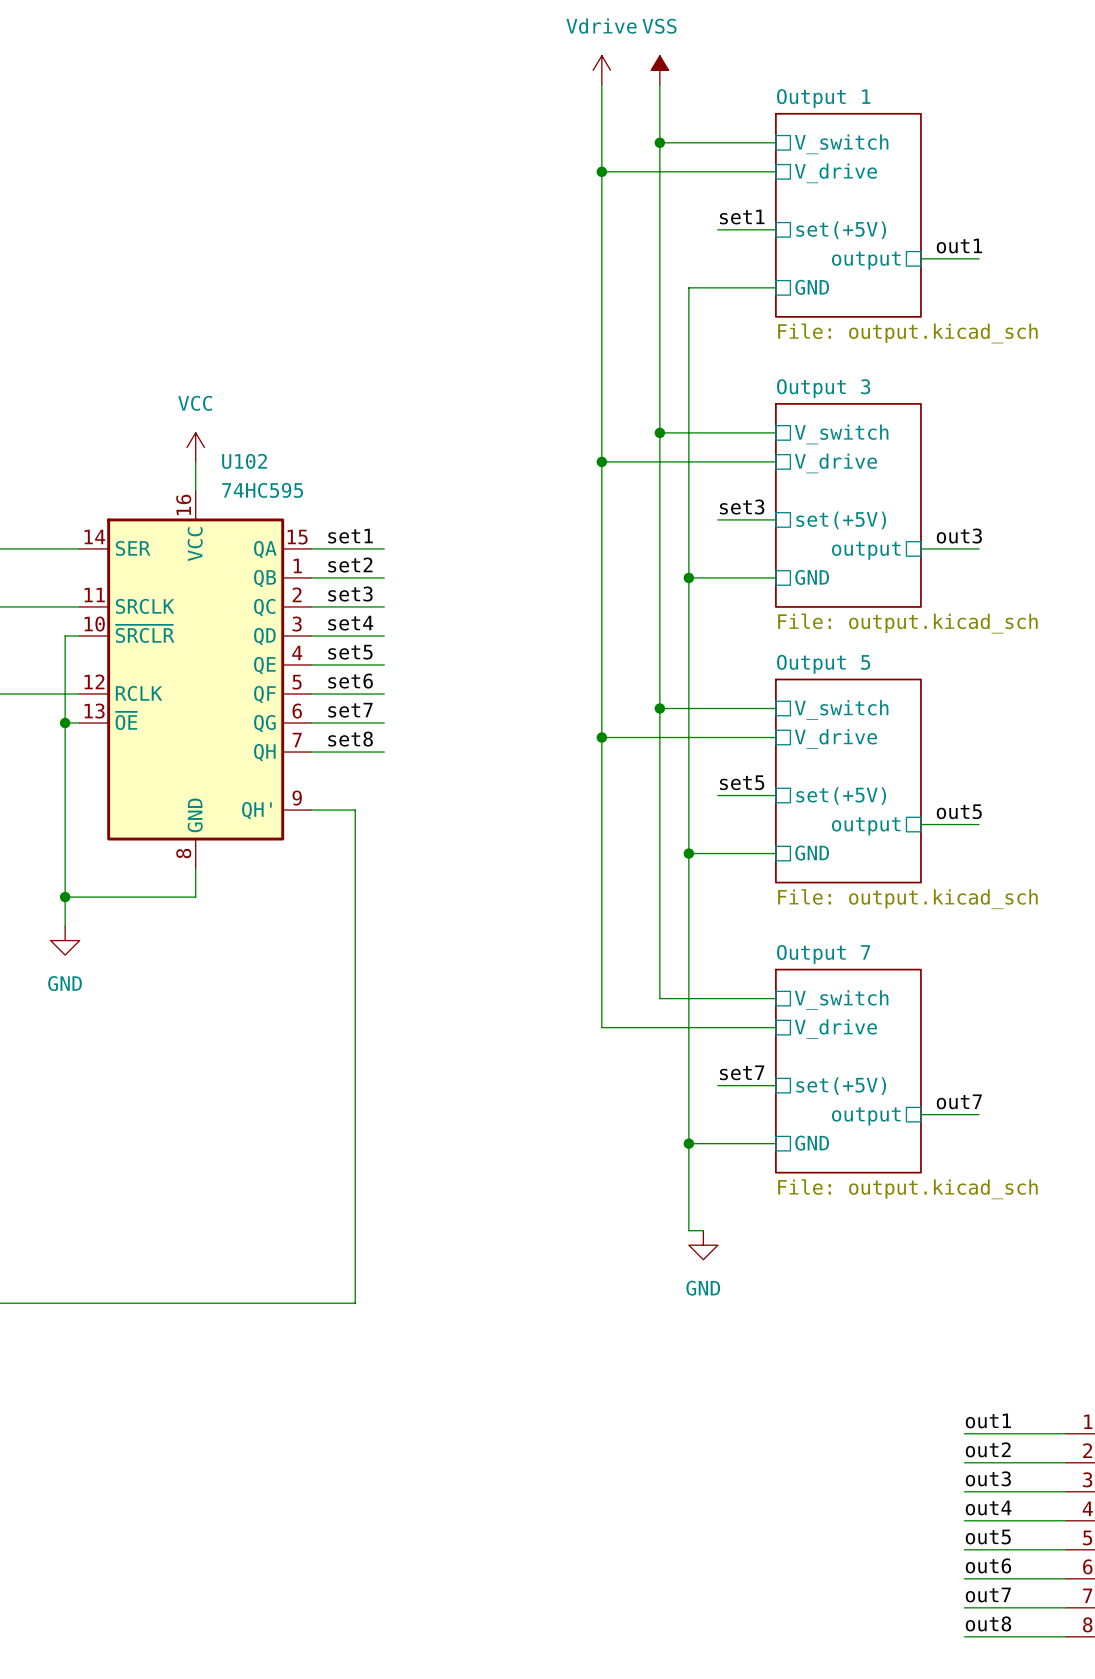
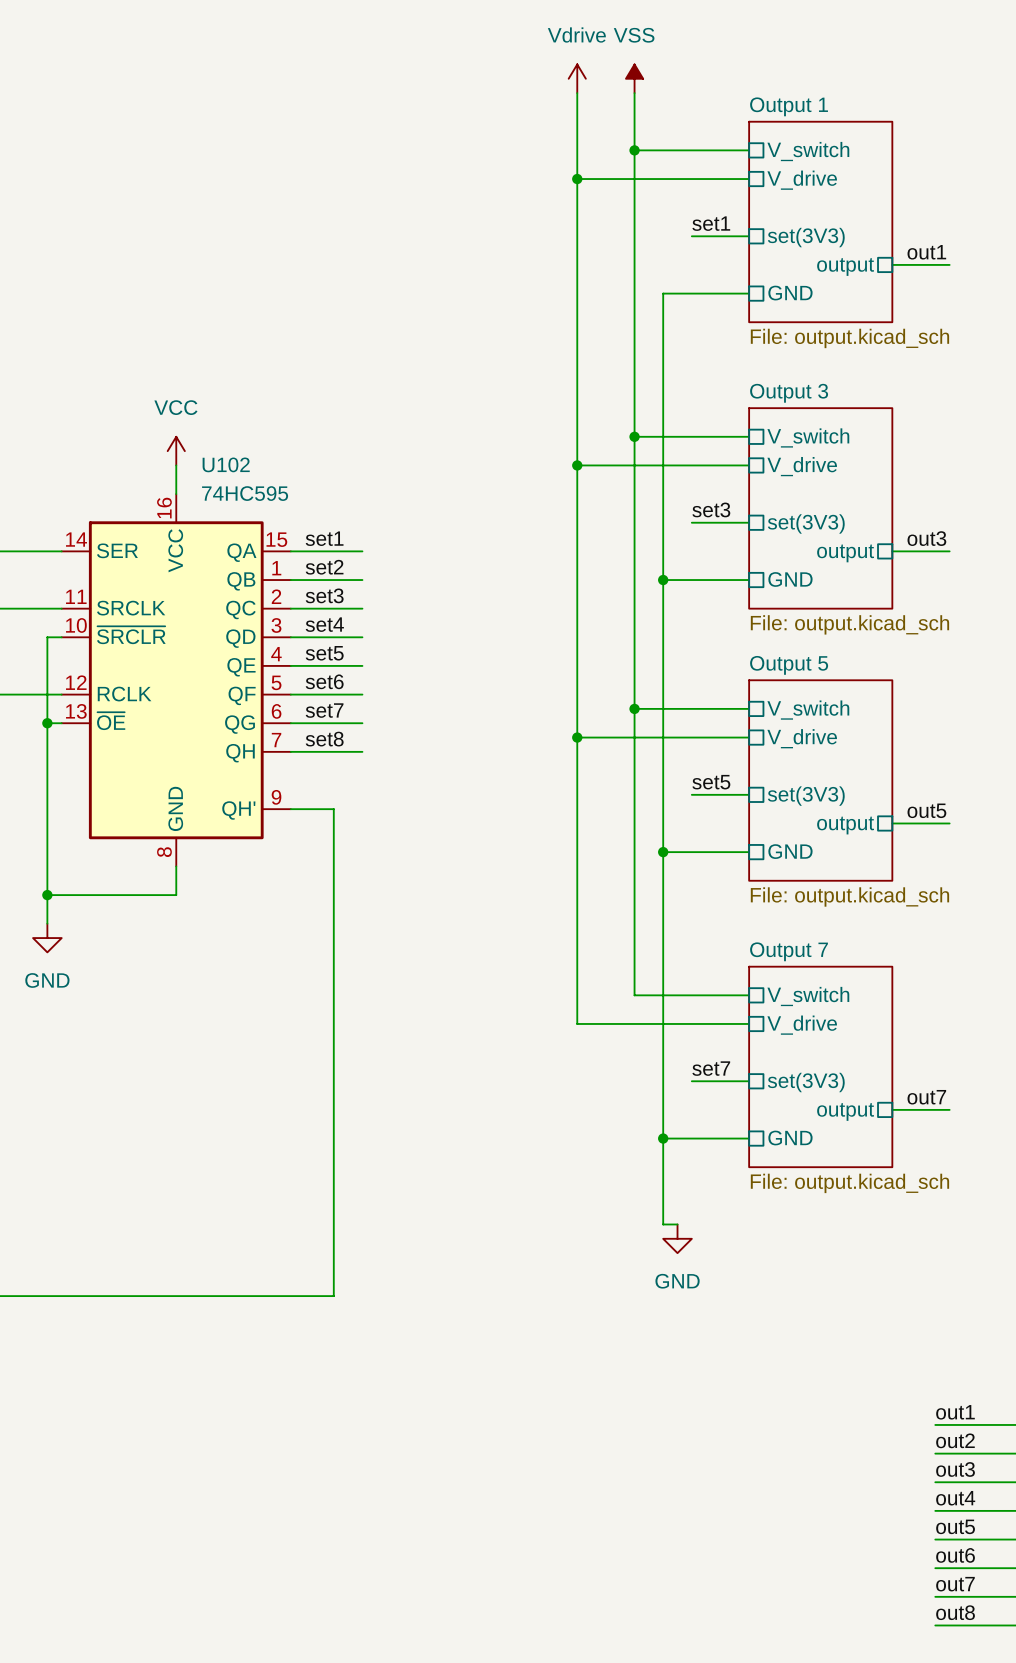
sheet pin: set(+5V) (841, 230) -> set(3V3) (806, 237)
sheet pin: set(+5V) (841, 520) -> set(3V3) (806, 523)
sheet pin: set(+5V) (841, 796) -> set(3V3) (806, 796)
sheet pin: set(+5V) (841, 1086) -> set(3V3) (806, 1082)

